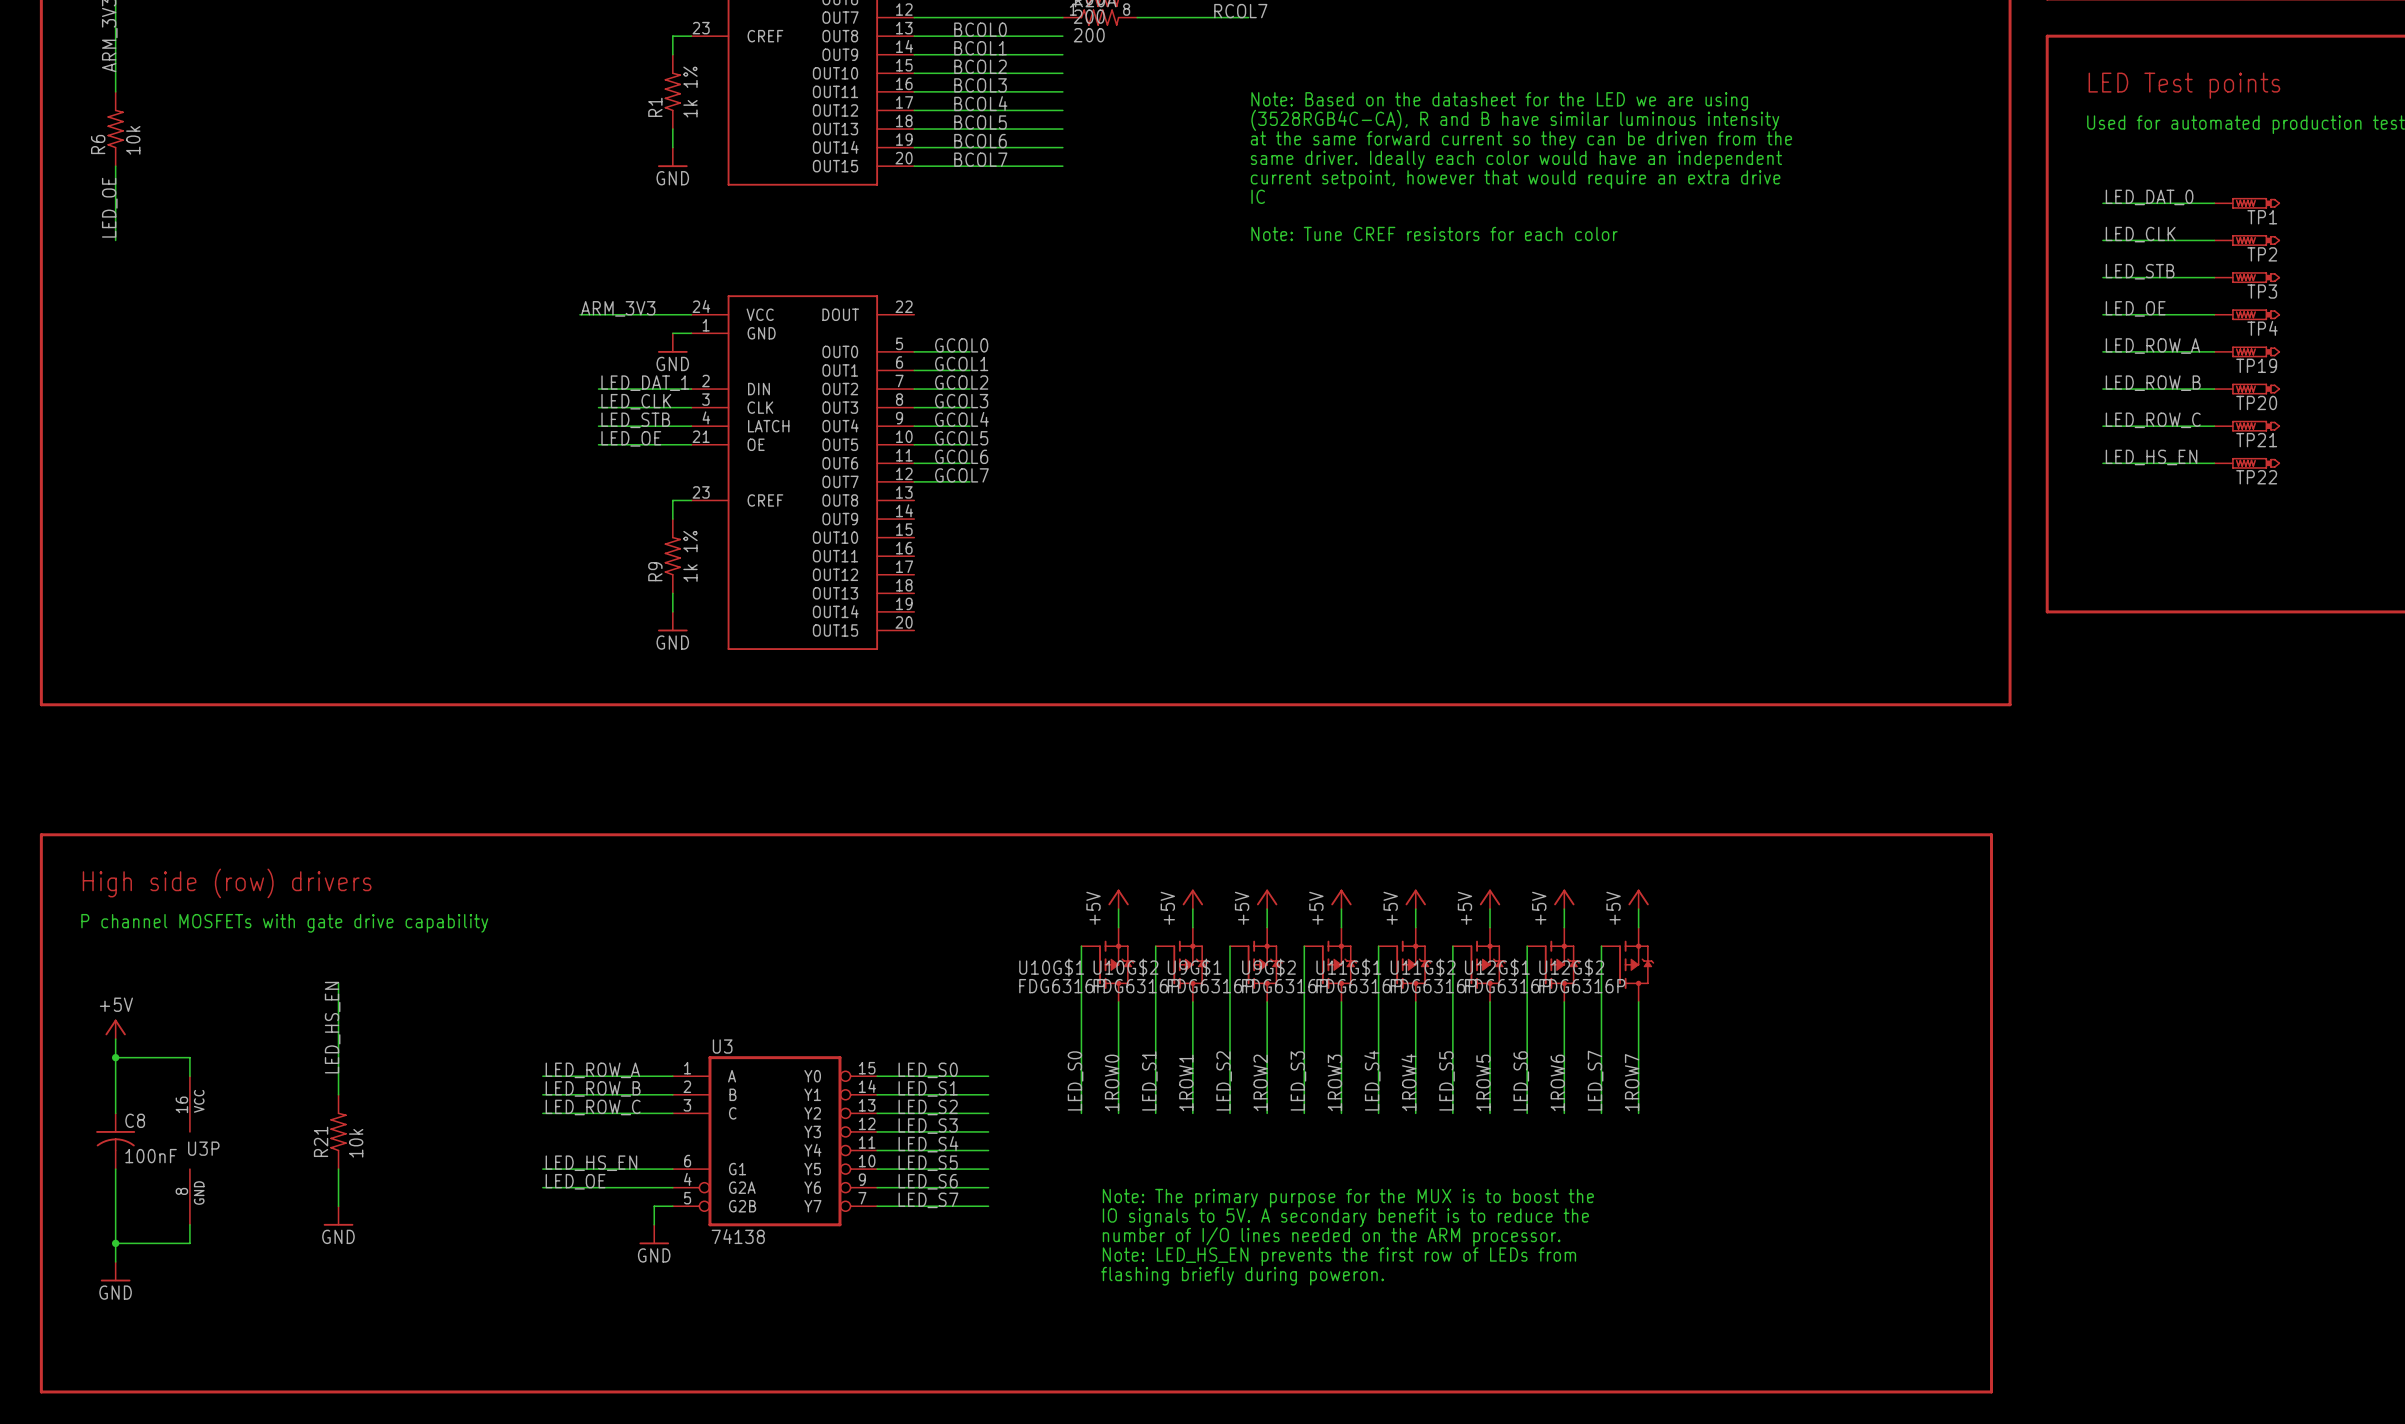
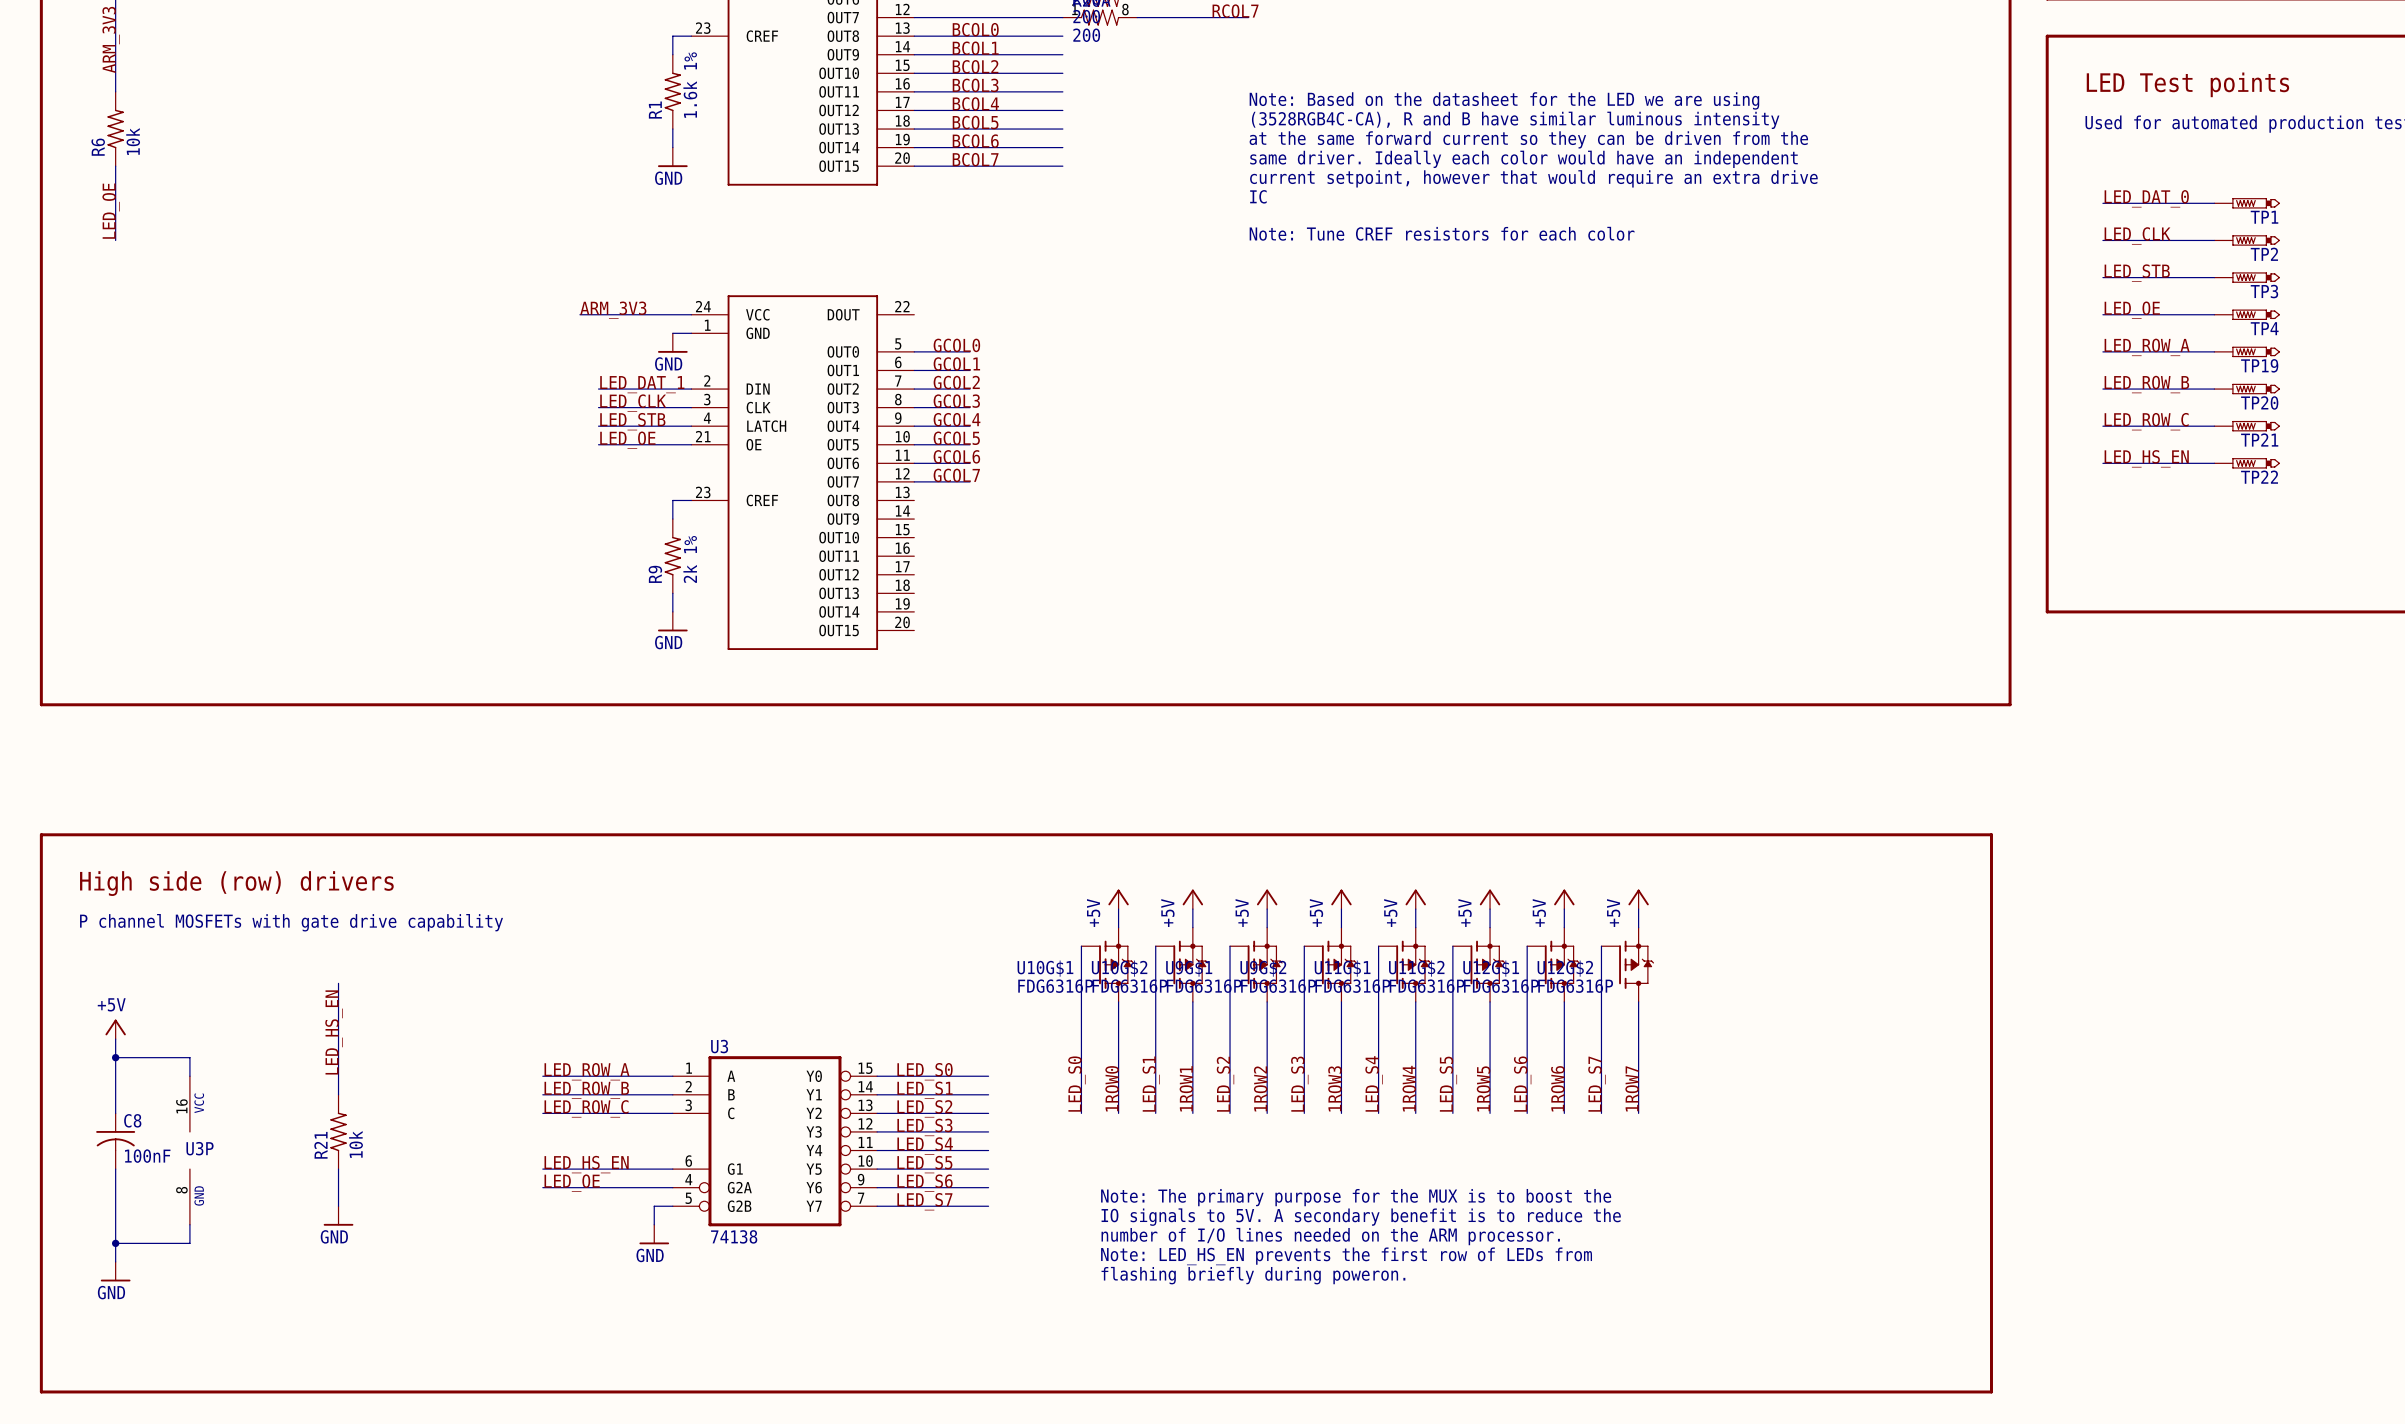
R1 value: 1k 1% (690, 92) -> 1.6k 1% (690, 85)
R9 value: 1k 1% (690, 556) -> 2k 1% (690, 559)

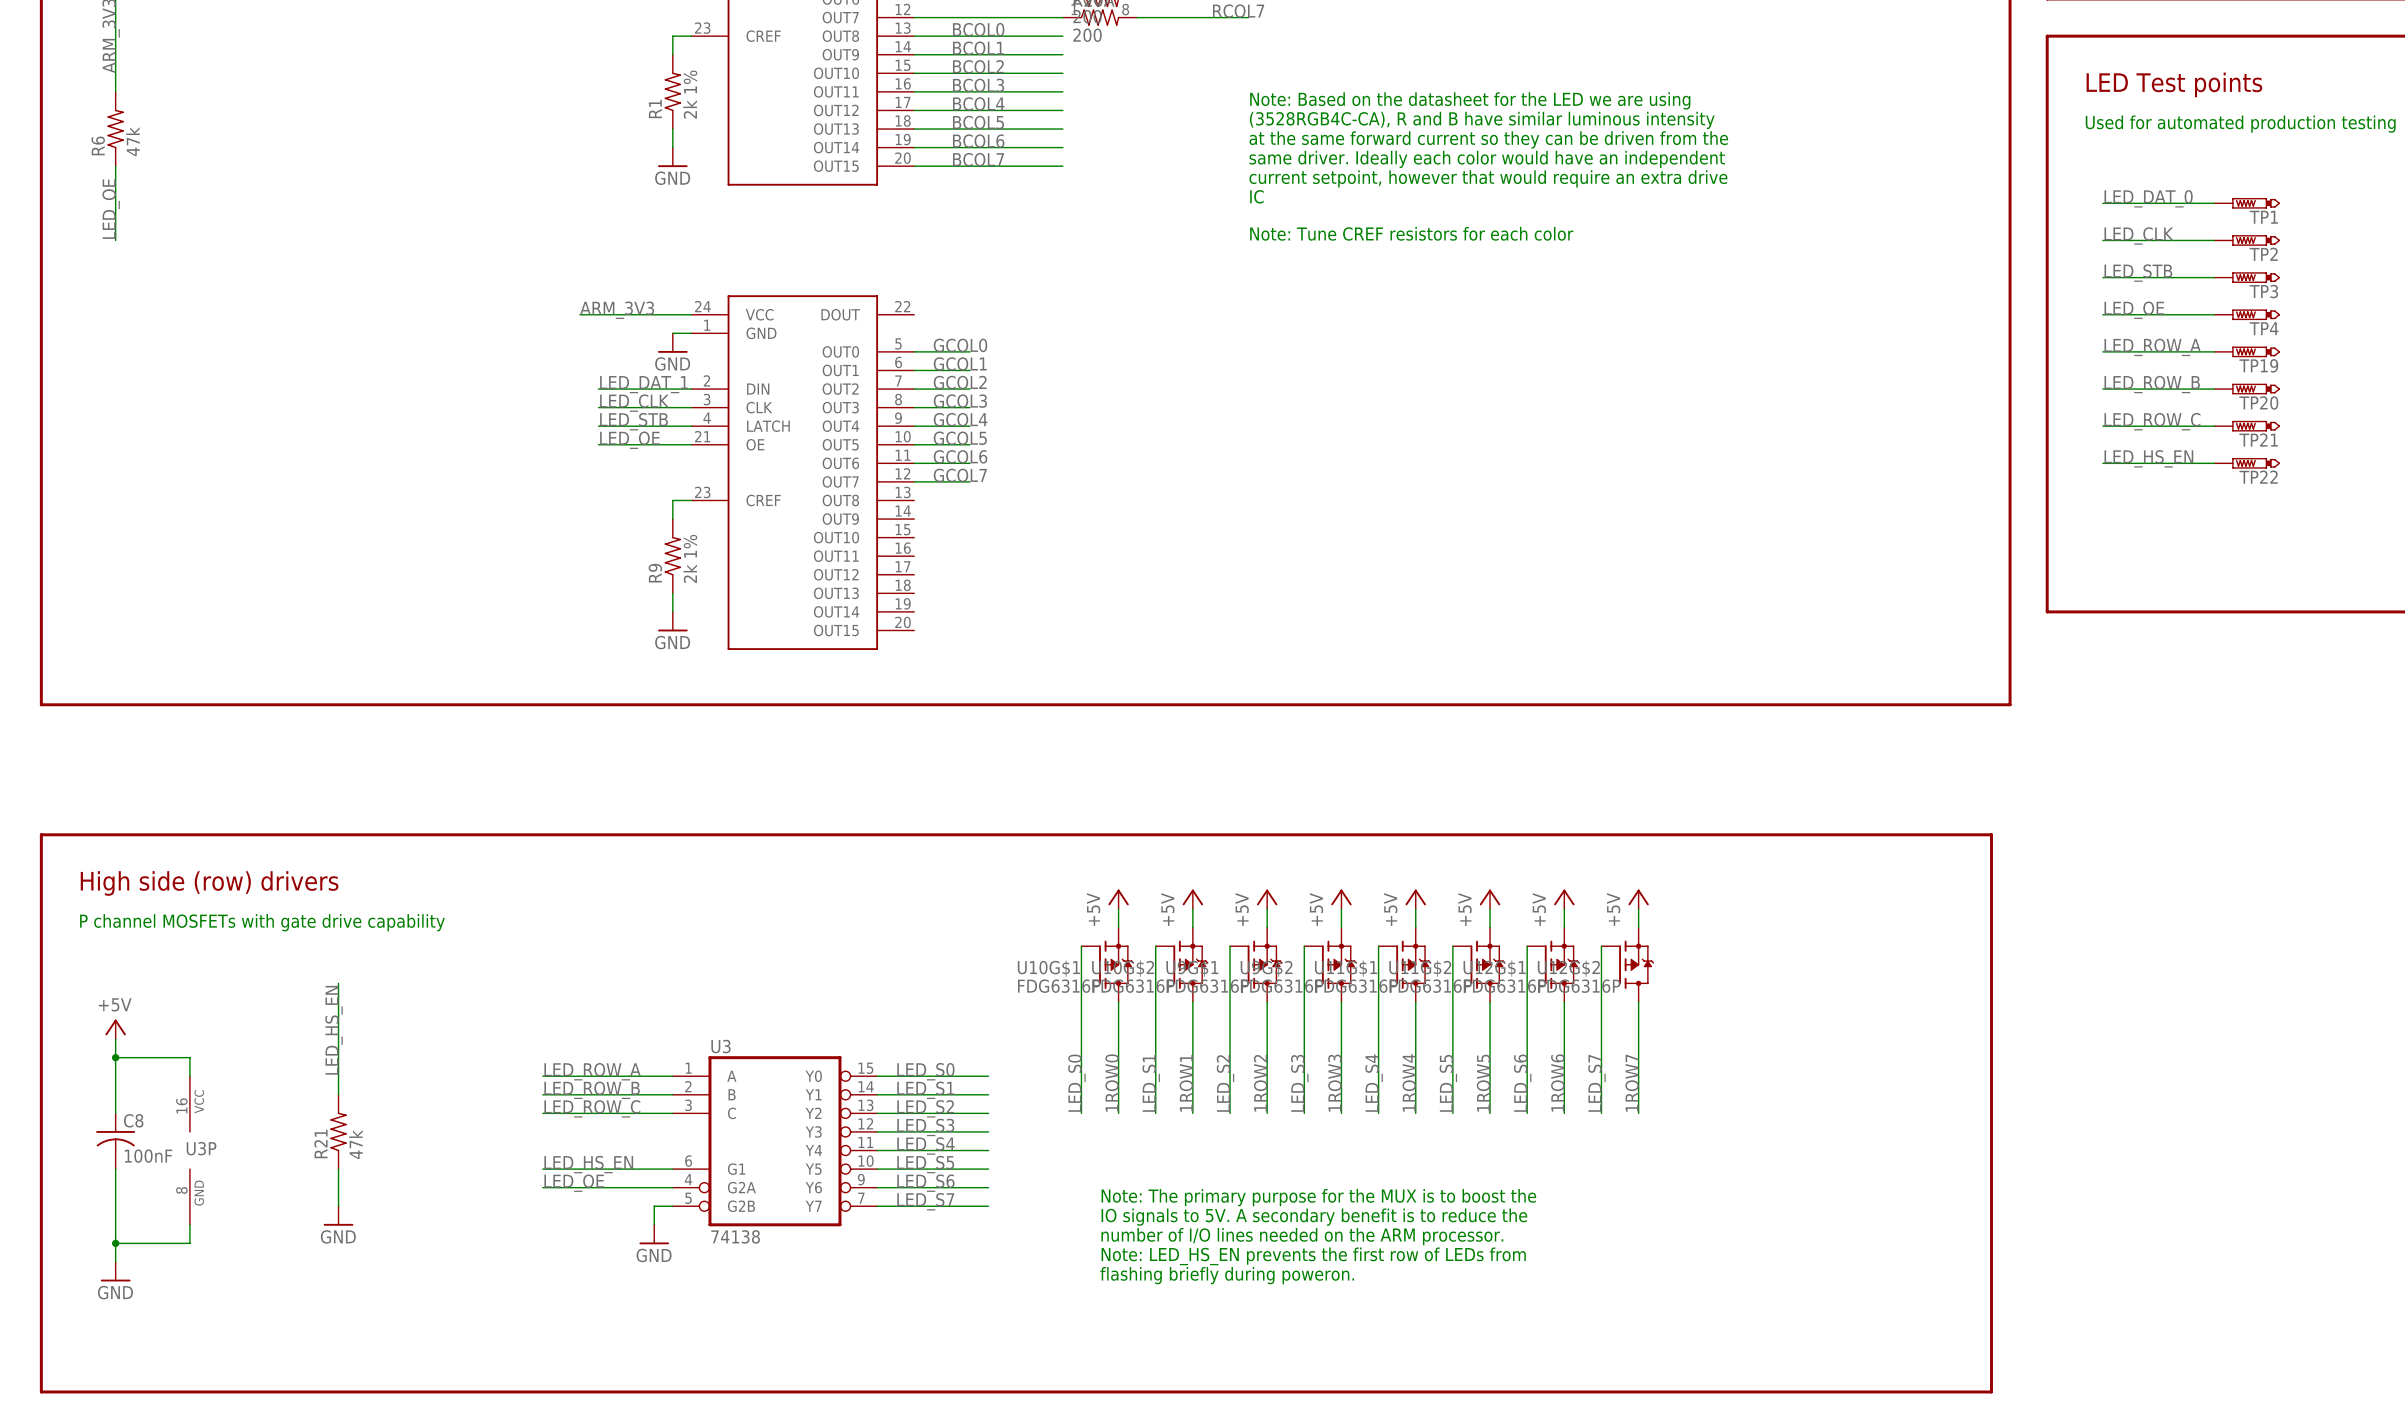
R1 value: 1.6k 1% (690, 85) -> 2k 1% (690, 94)
R6 value: 10k (133, 141) -> 47k (133, 141)
R21 value: 10k (356, 1144) -> 47k (355, 1144)

